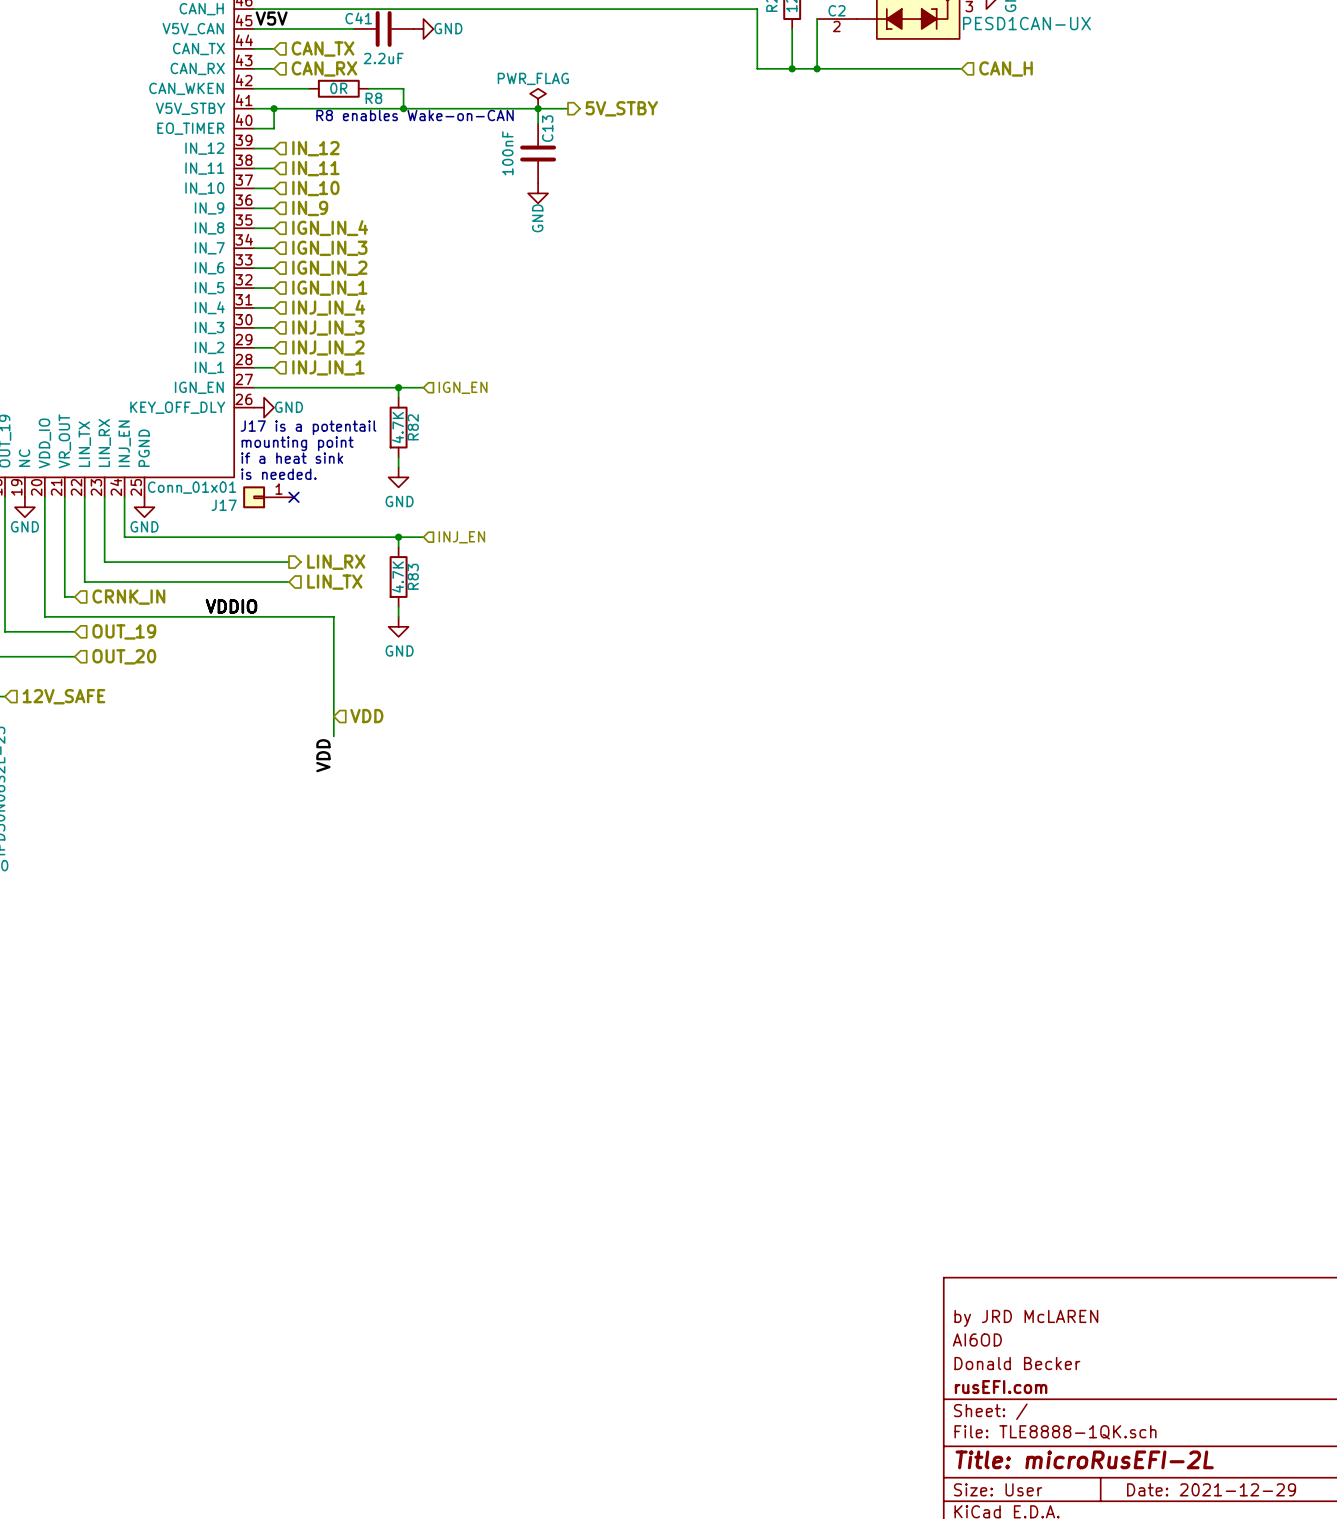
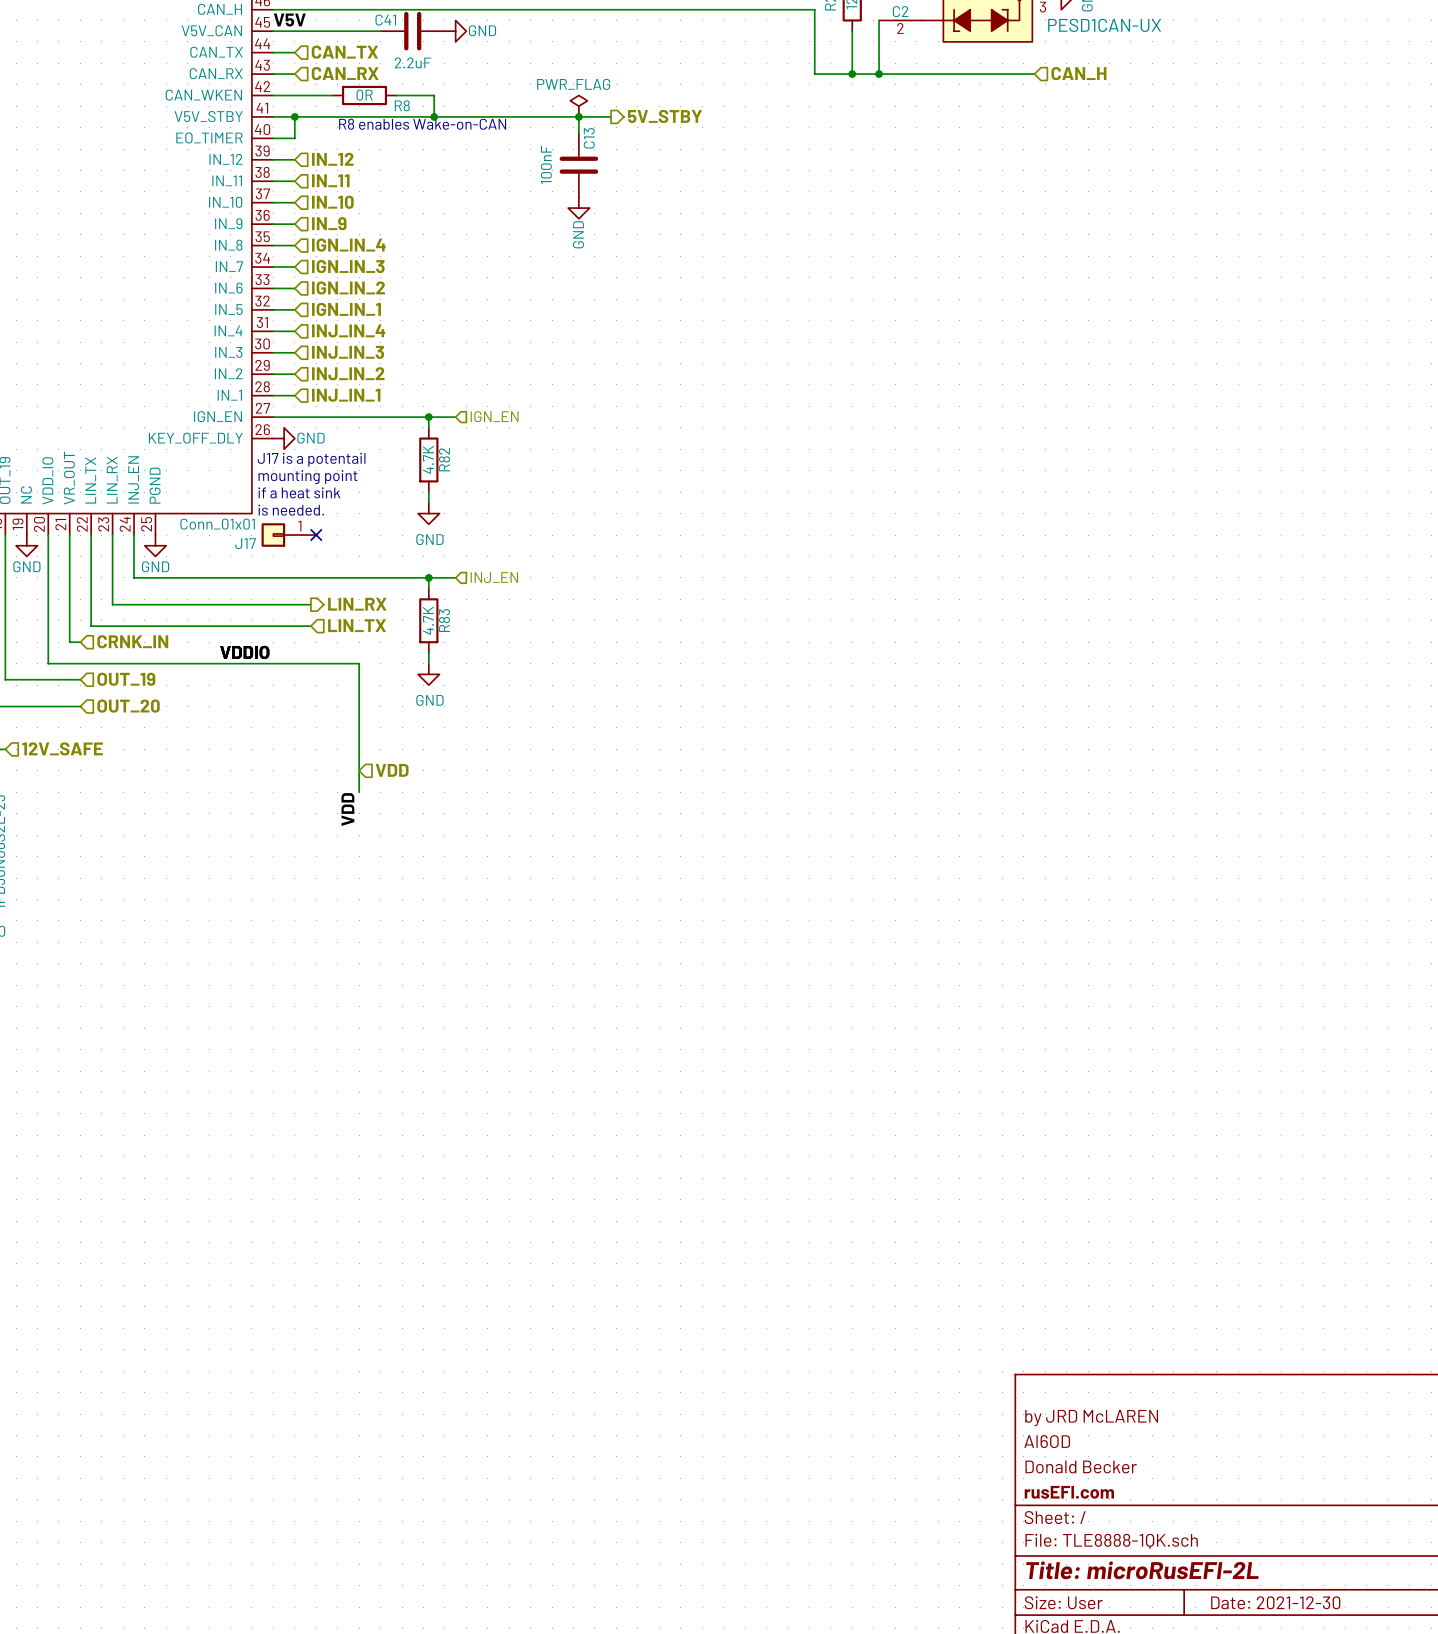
title block: Date: 2021-12-29 (1211, 1489) -> Date: 2021-12-30 (1275, 1602)

